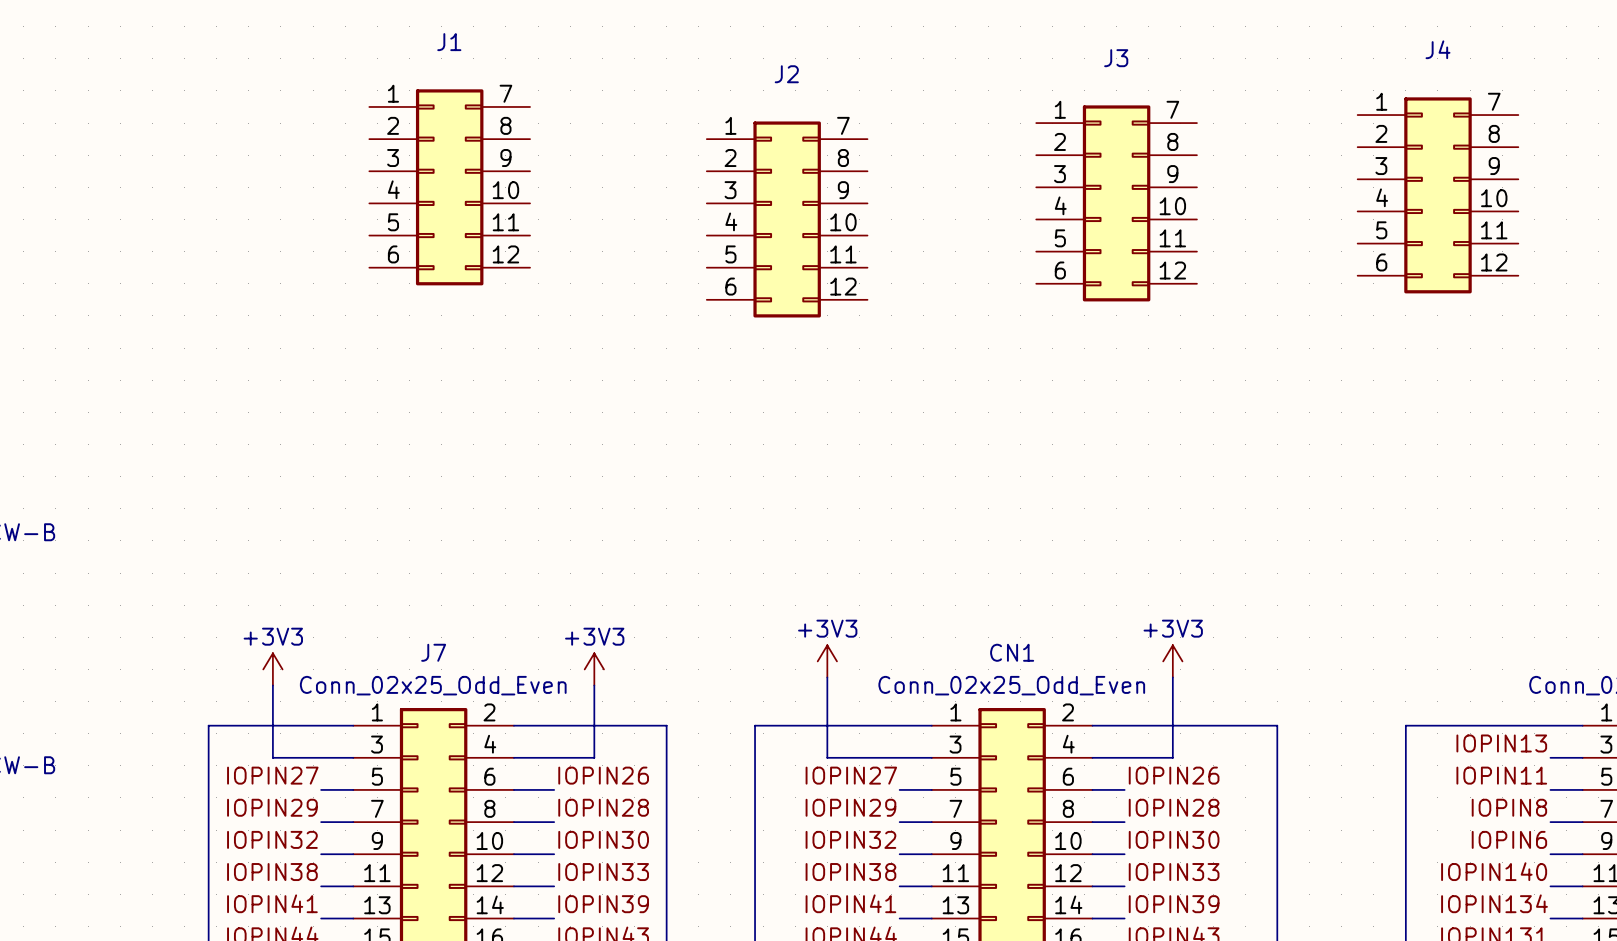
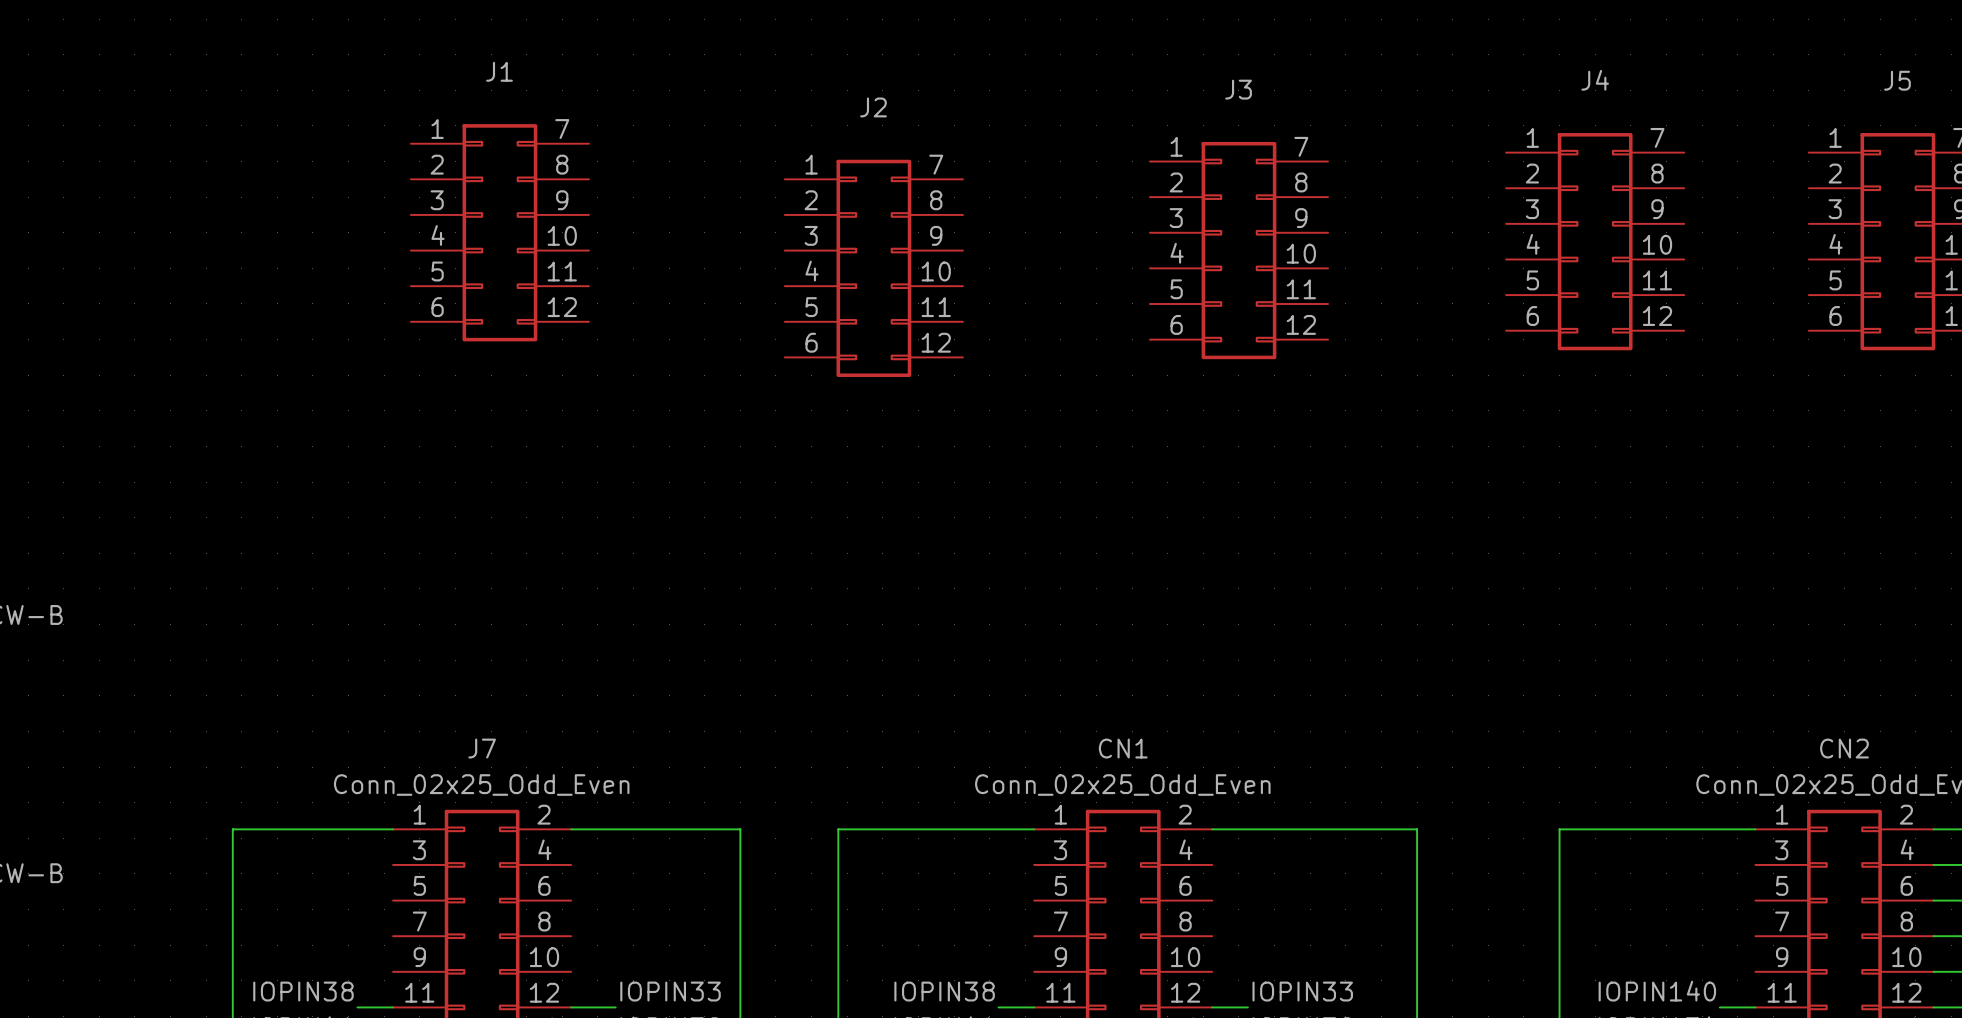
power symbol: +3V3 (827, 661) -> none
power symbol: +3V3 (1172, 661) -> none
power symbol: +3V3 (272, 669) -> none
power symbol: +3V3 (594, 669) -> none
wire: (827, 677) (827, 757) (931, 757) -> none
wire: (1172, 677) (1172, 757) (1092, 757) -> none
wire: (272, 685) (272, 757) (353, 757) -> none
wire: (594, 685) (594, 757) (513, 757) -> none
label: IOPIN13 (1501, 743) -> none
wire: (1550, 757) (1582, 757) -> none
label: IOPIN27 (272, 775) -> none
label: IOPIN26 (603, 775) -> none
label: IOPIN27 (851, 775) -> none
label: IOPIN26 (1174, 775) -> none
label: IOPIN11 (1501, 775) -> none
wire: (321, 789) (353, 789) -> none
wire: (513, 789) (554, 789) -> none
wire: (899, 789) (931, 789) -> none
wire: (1092, 789) (1124, 789) -> none
wire: (1550, 789) (1582, 789) -> none
label: IOPIN29 (272, 807) -> none
label: IOPIN28 (603, 807) -> none
label: IOPIN29 (850, 807) -> none
label: IOPIN28 (1174, 807) -> none
label: IOPIN8 (1509, 807) -> none
wire: (321, 822) (353, 822) -> none
wire: (513, 822) (554, 822) -> none
wire: (899, 822) (931, 822) -> none
wire: (1092, 822) (1124, 822) -> none
wire: (1550, 822) (1582, 822) -> none
label: IOPIN32 (272, 839) -> none
label: IOPIN30 (603, 839) -> none
label: IOPIN32 (850, 839) -> none
label: IOPIN30 (1174, 839) -> none
label: IOPIN6 (1509, 839) -> none
wire: (321, 854) (353, 854) -> none
wire: (513, 854) (554, 854) -> none
wire: (899, 854) (931, 854) -> none
wire: (1092, 854) (1124, 854) -> none
wire: (1550, 854) (1582, 854) -> none

